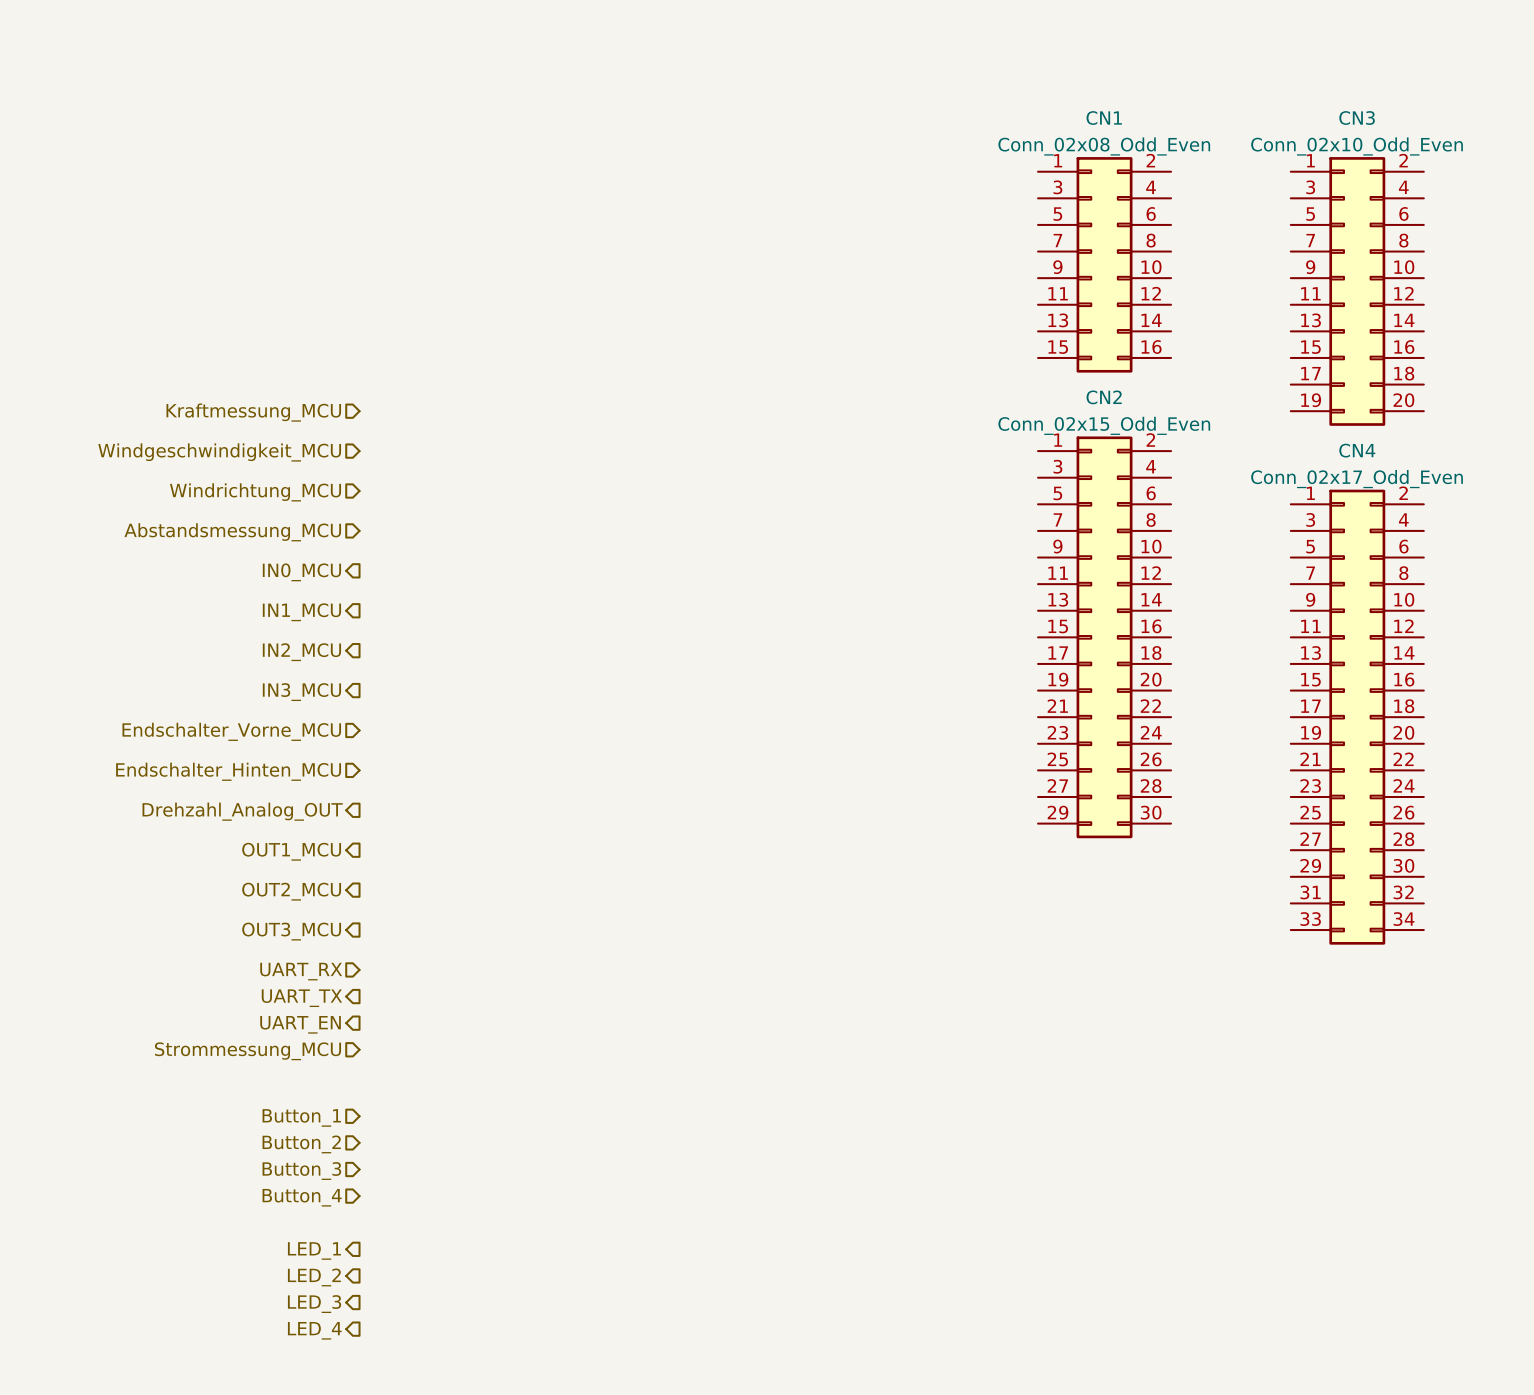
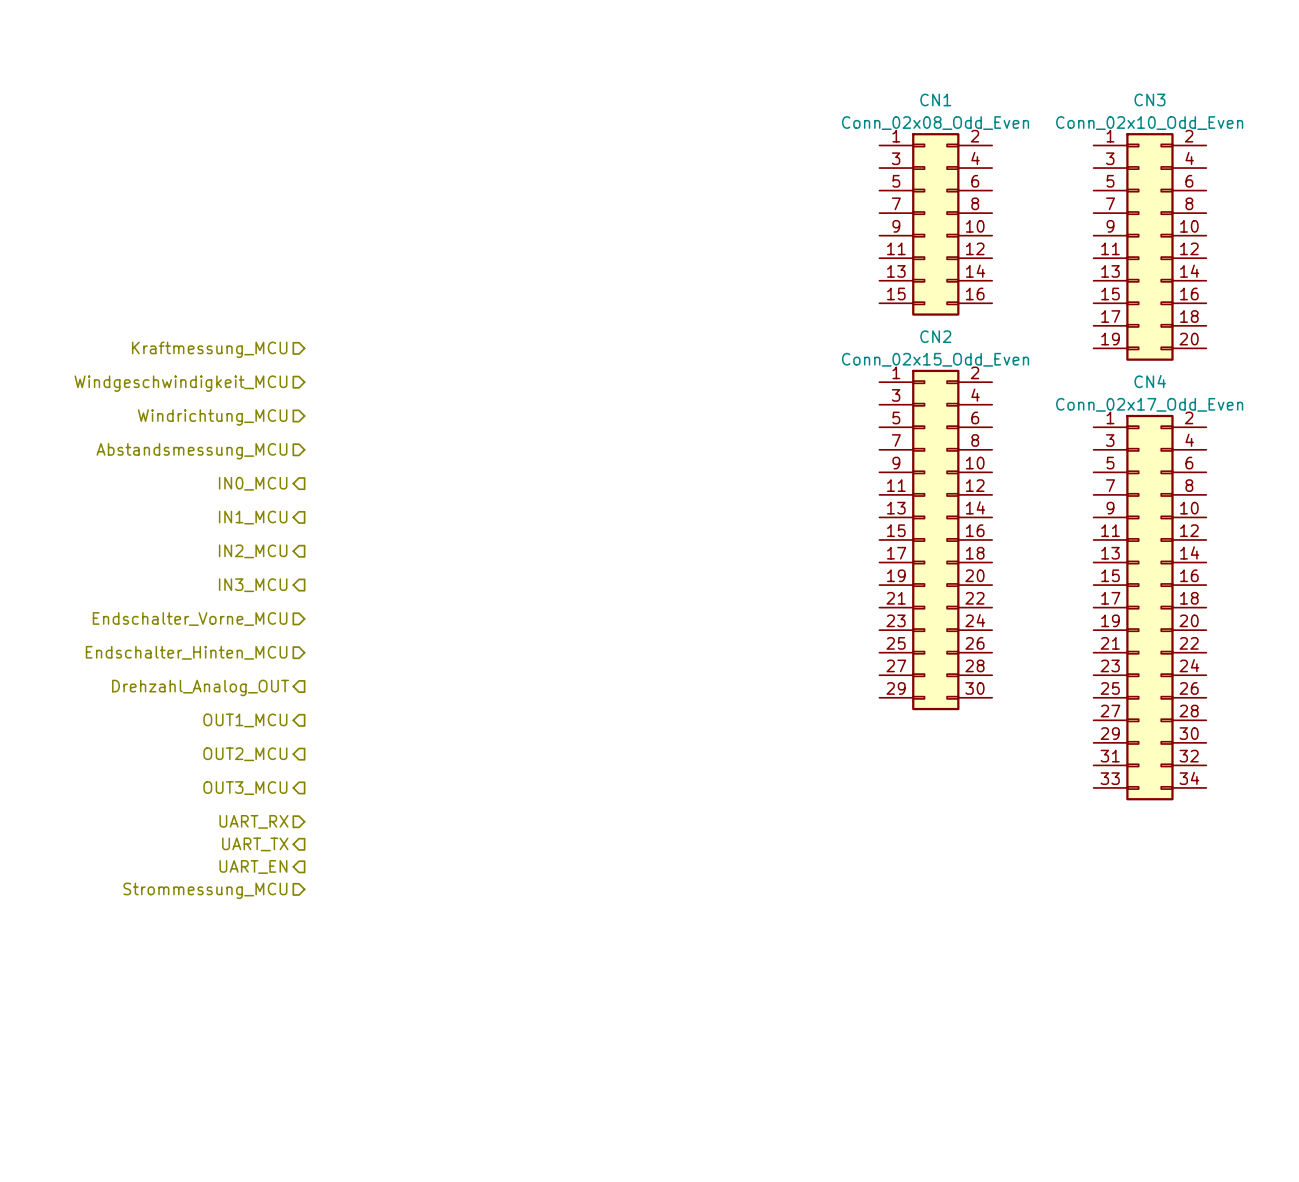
hierarchical label: Button_1 (301, 1117) -> none
hierarchical label: Button_2 (301, 1144) -> none
hierarchical label: Button_3 (301, 1171) -> none
hierarchical label: Button_4 (302, 1197) -> none
hierarchical label: LED_1 (314, 1250) -> none
hierarchical label: LED_2 (314, 1277) -> none
hierarchical label: LED_3 (314, 1304) -> none
hierarchical label: LED_4 (314, 1330) -> none

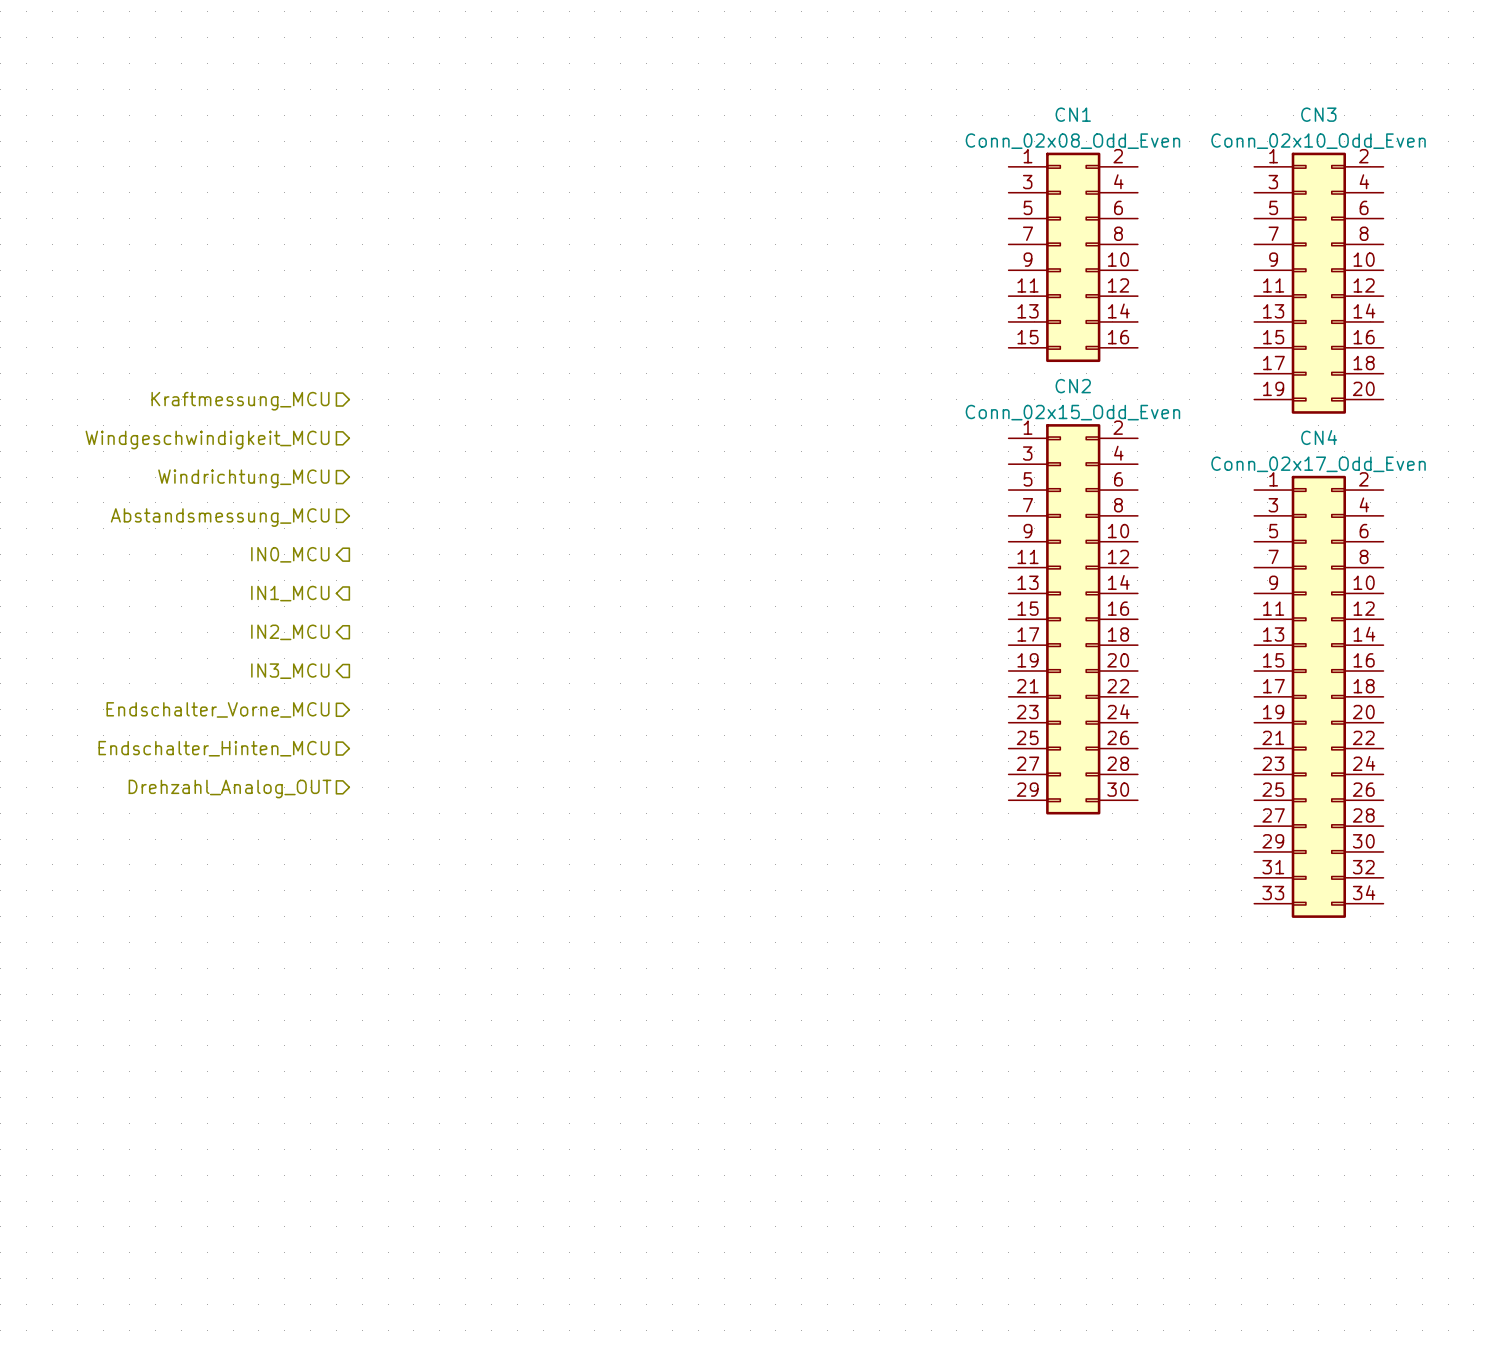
hierarchical label shape: output (200, 687) -> input (230, 789)
hierarchical label: OUT1_MCU (245, 720) -> none
hierarchical label: OUT2_MCU (245, 754) -> none
hierarchical label: OUT3_MCU (245, 788) -> none
hierarchical label: UART_RX (253, 821) -> none
hierarchical label: UART_TX (255, 844) -> none
hierarchical label: UART_EN (253, 866) -> none
hierarchical label: Strommessung_MCU (205, 890) -> none

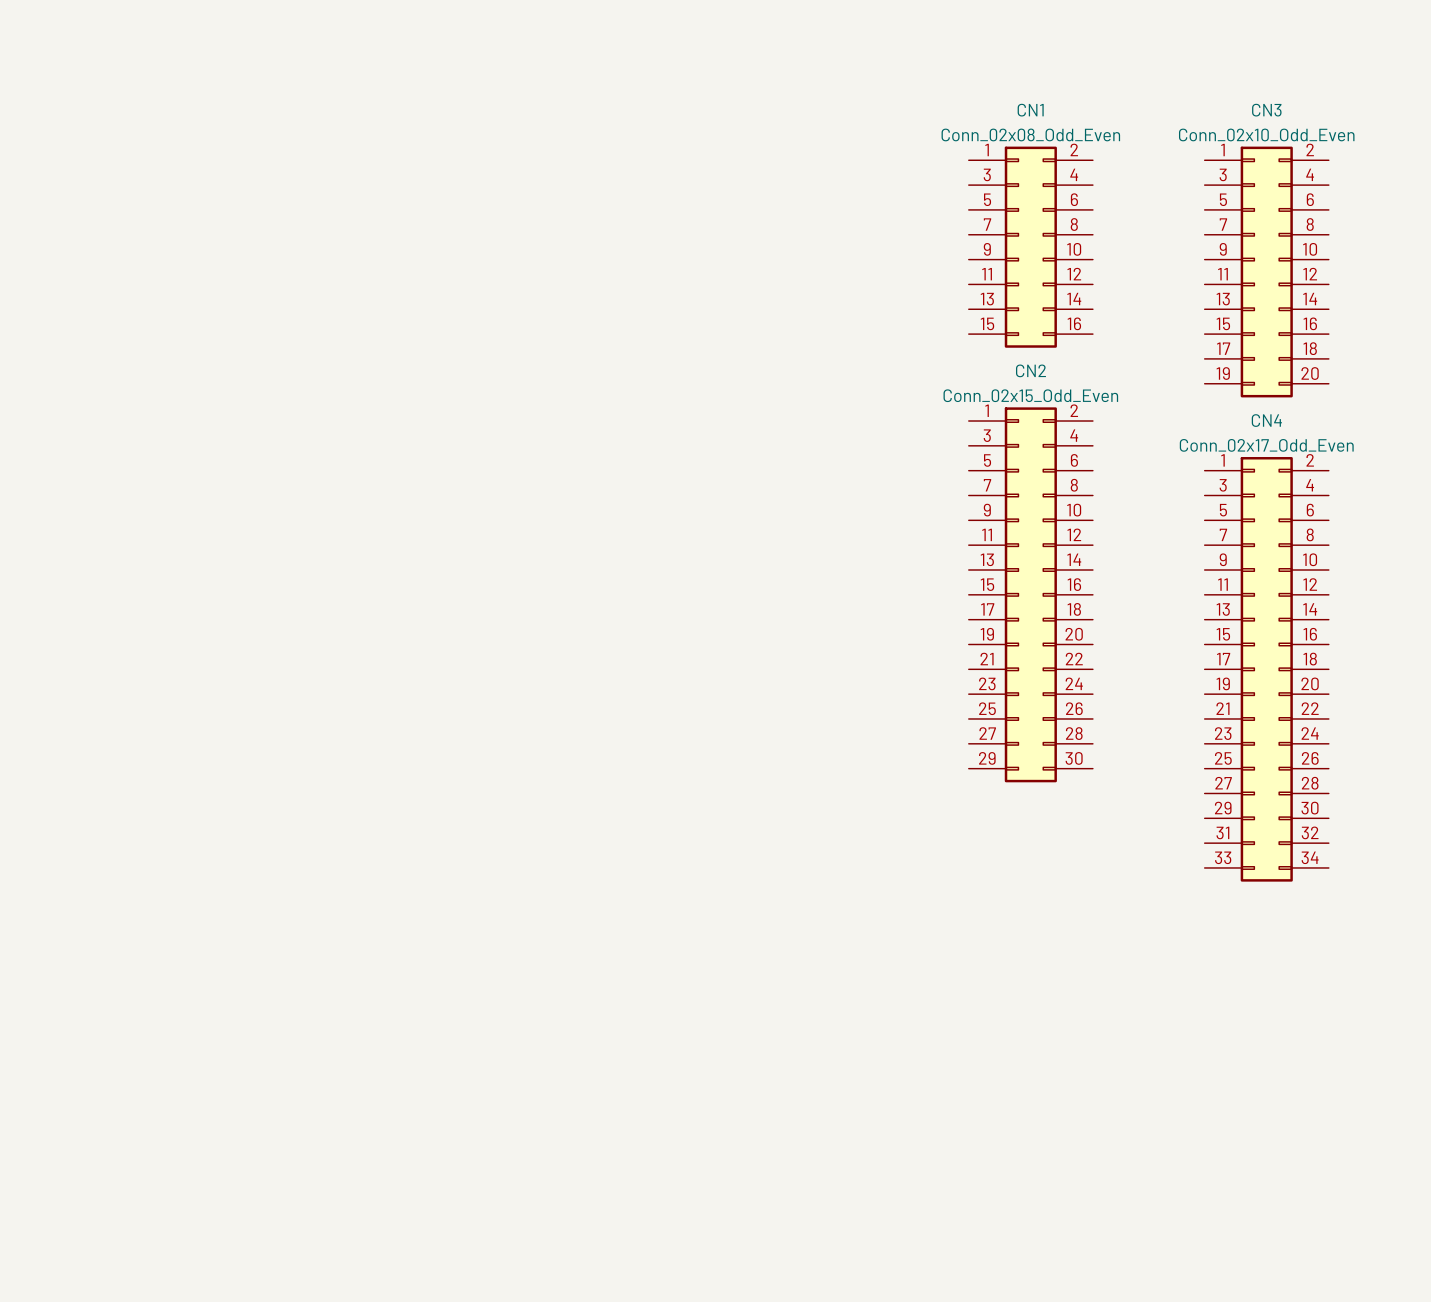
hierarchical label: Kraftmessung_MCU (240, 401) -> none
hierarchical label: Windgeschwindigkeit_MCU (207, 439) -> none
hierarchical label: Windrichtung_MCU (243, 478) -> none
hierarchical label: Abstandsmessung_MCU (220, 517) -> none
hierarchical label: IN0_MCU (290, 554) -> none
hierarchical label: IN1_MCU (290, 593) -> none
hierarchical label: IN2_MCU (290, 632) -> none
hierarchical label: IN3_MCU (290, 671) -> none
hierarchical label: Endschalter_Vorne_MCU (218, 709) -> none
hierarchical label: Endschalter_Hinten_MCU (214, 748) -> none
hierarchical label: Drehzahl_Analog_OUT (230, 789) -> none

